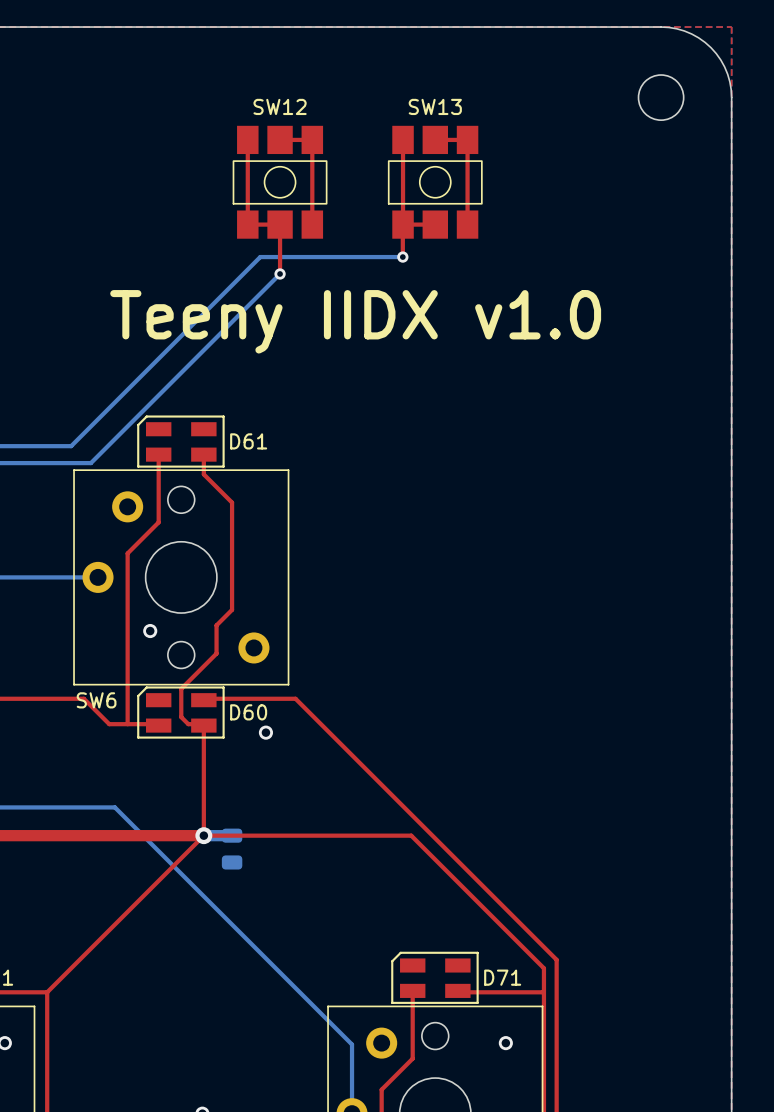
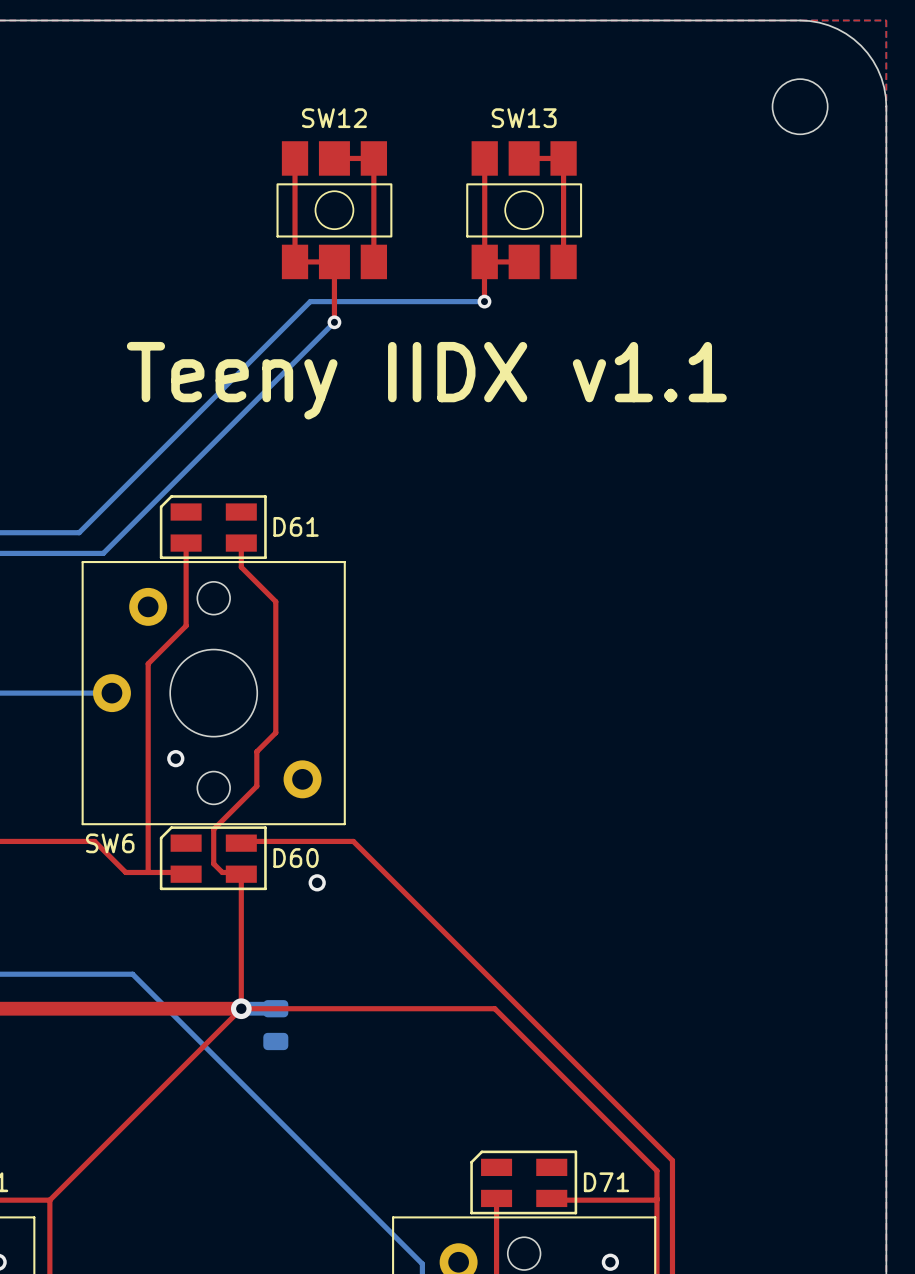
text: Teeny IIDX v1.0 (355, 321) -> Teeny IIDX v1.1 (426, 380)

